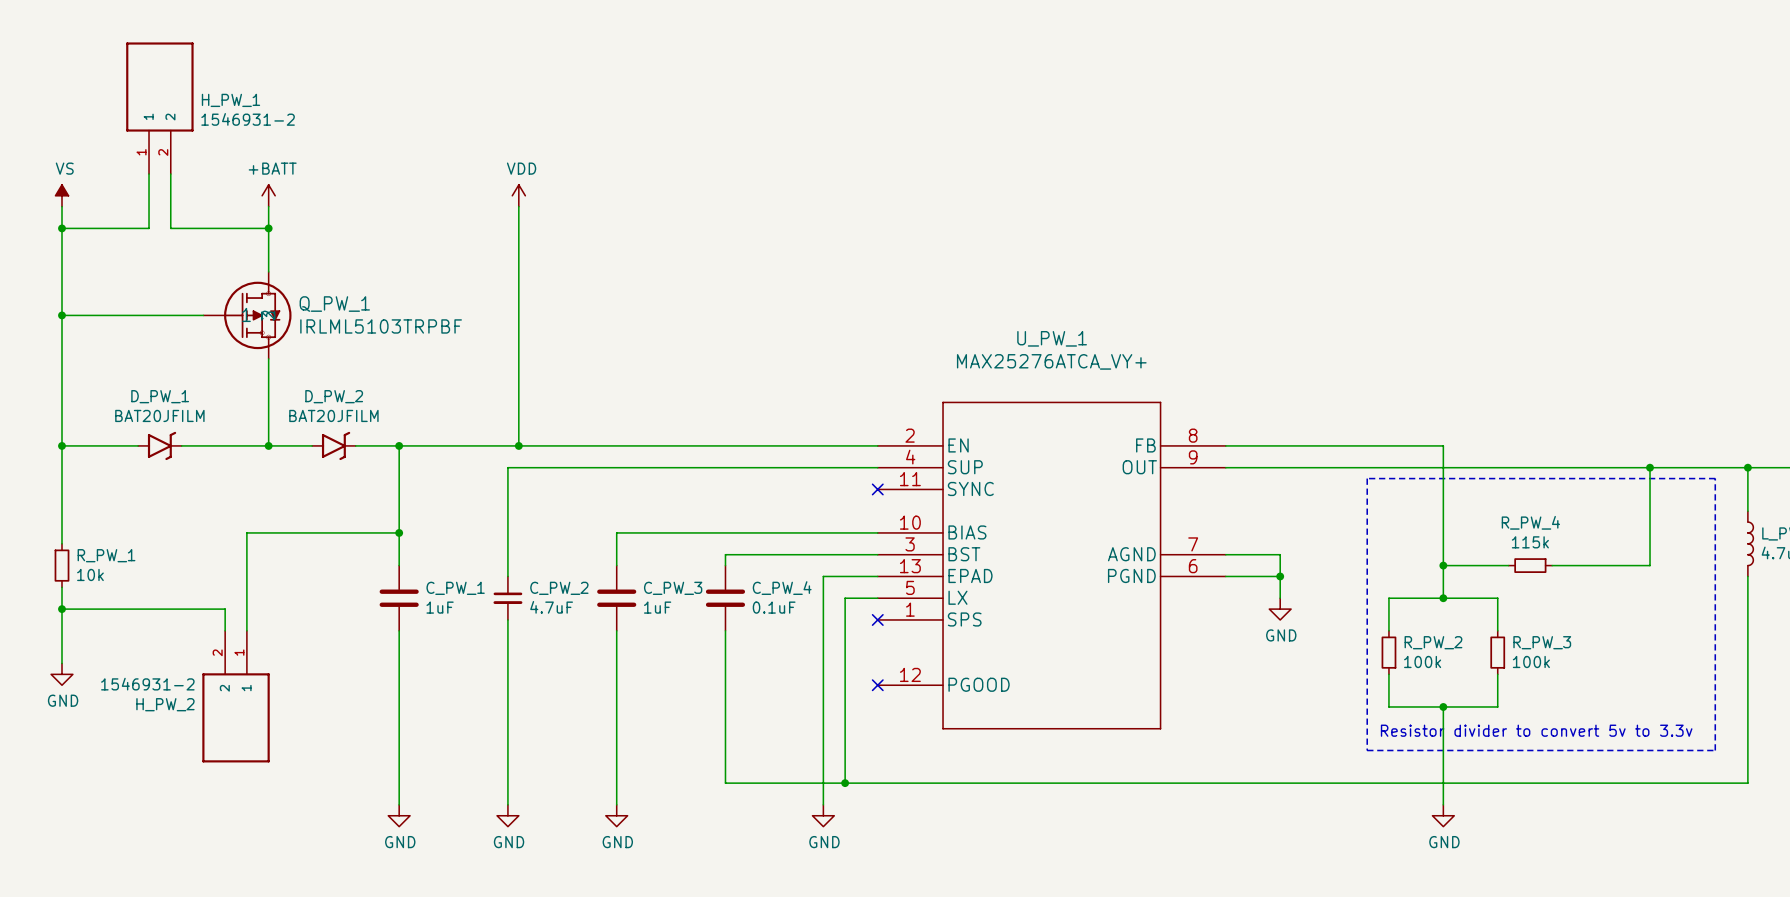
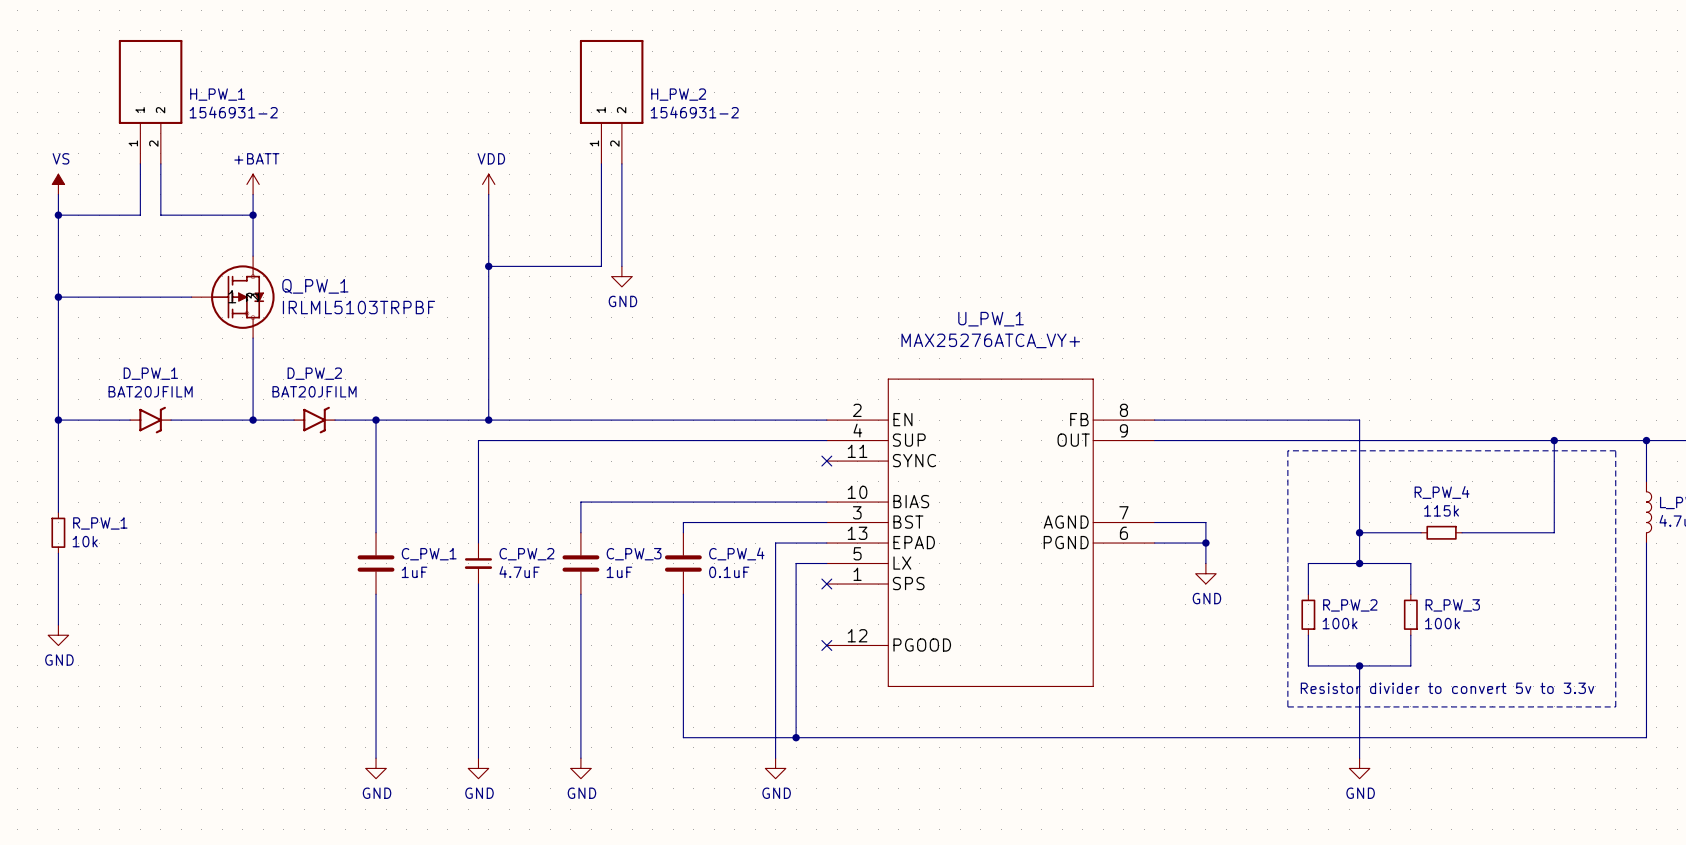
wire: none -> (601, 163) (601, 266) (488, 266)
wire: none -> (621, 163) (621, 266)
junction: none -> (488, 266)
power symbol: none -> GND (621, 276)
wire: (399, 532) (246, 532) (246, 630) -> none
junction: (399, 532) -> none
wire: (61, 609) (225, 609) (225, 630) -> none
junction: (61, 609) -> none
H_PW_2 position: (236, 696) -> (611, 101)
H_PW_2 rotation: 0° (236, 717) -> 180° (611, 81)

